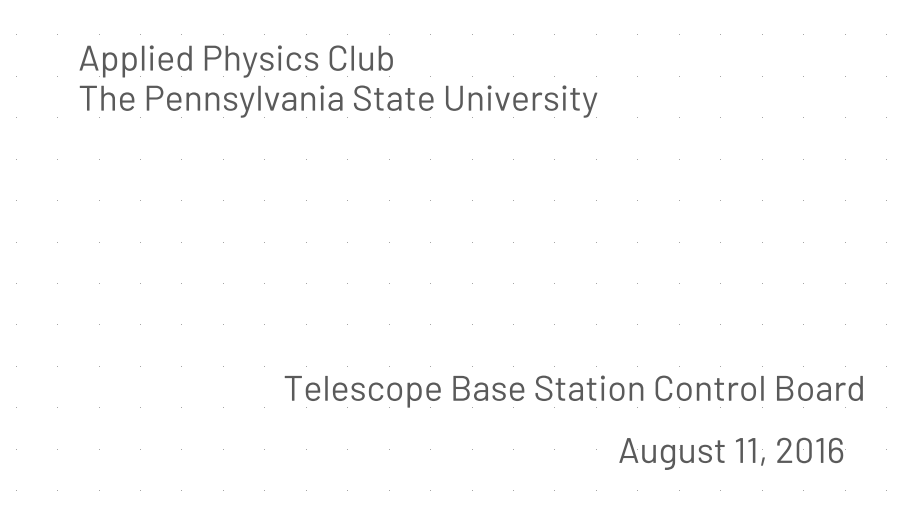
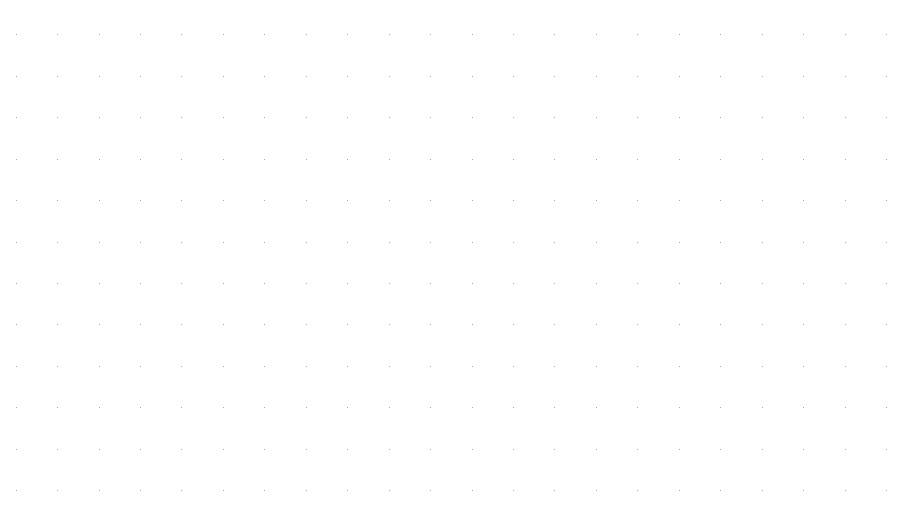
text: Applied Physics Club (236, 61) -> none
text: The Pennsylvania State University (338, 101) -> none
text: Telescope Base Station Control Board (573, 391) -> none
text: August 11, 2016 (731, 453) -> none

